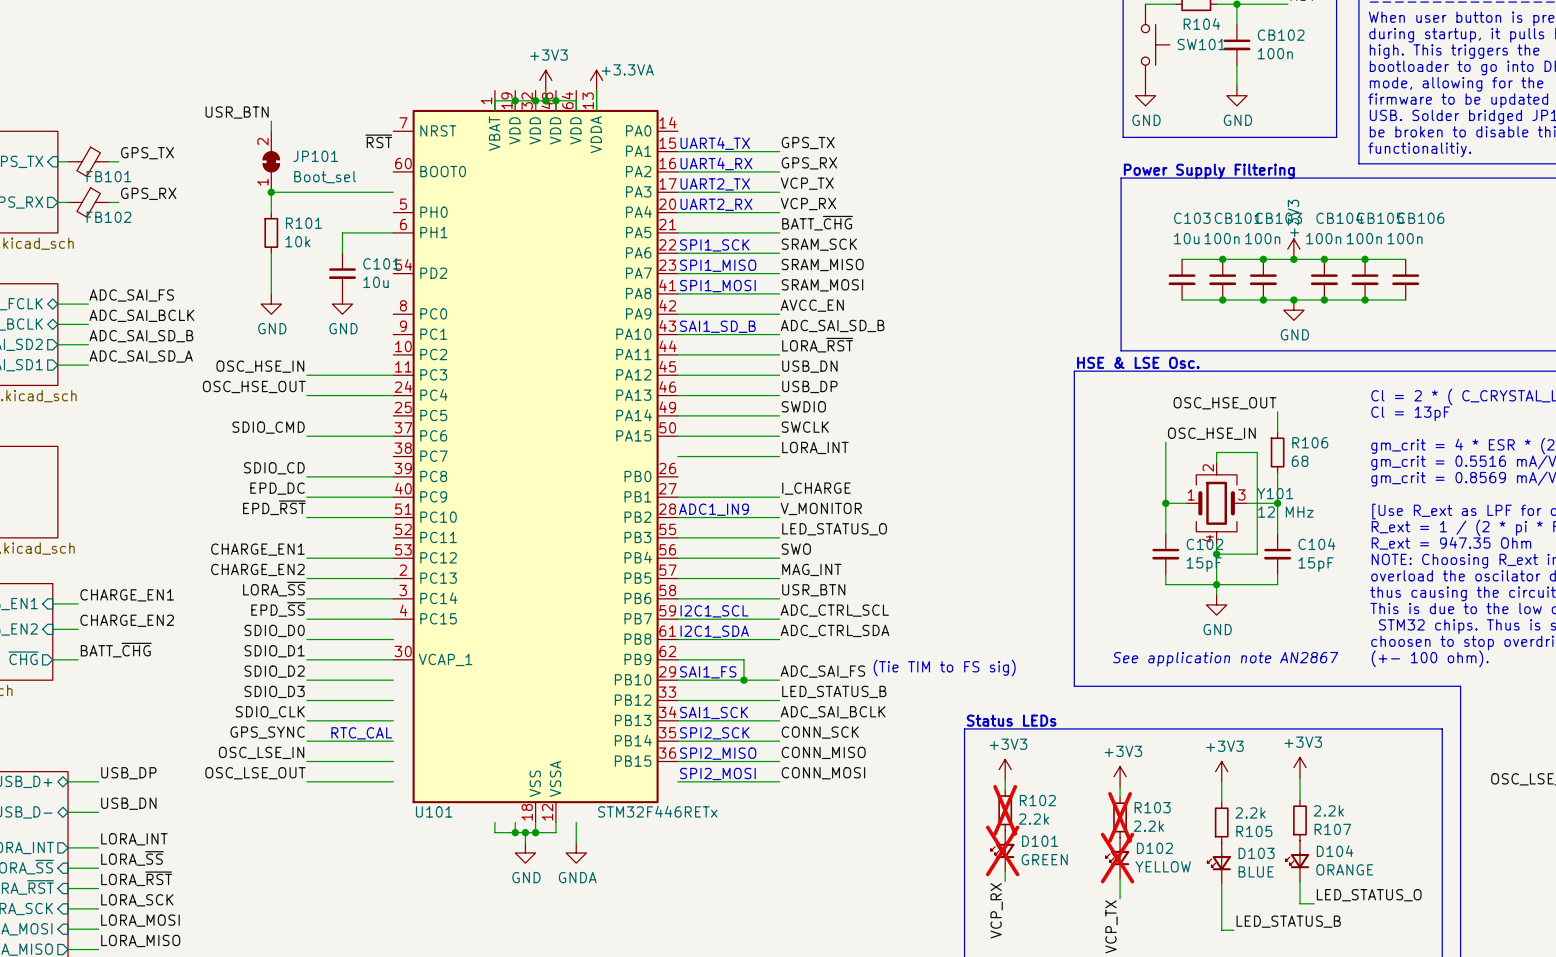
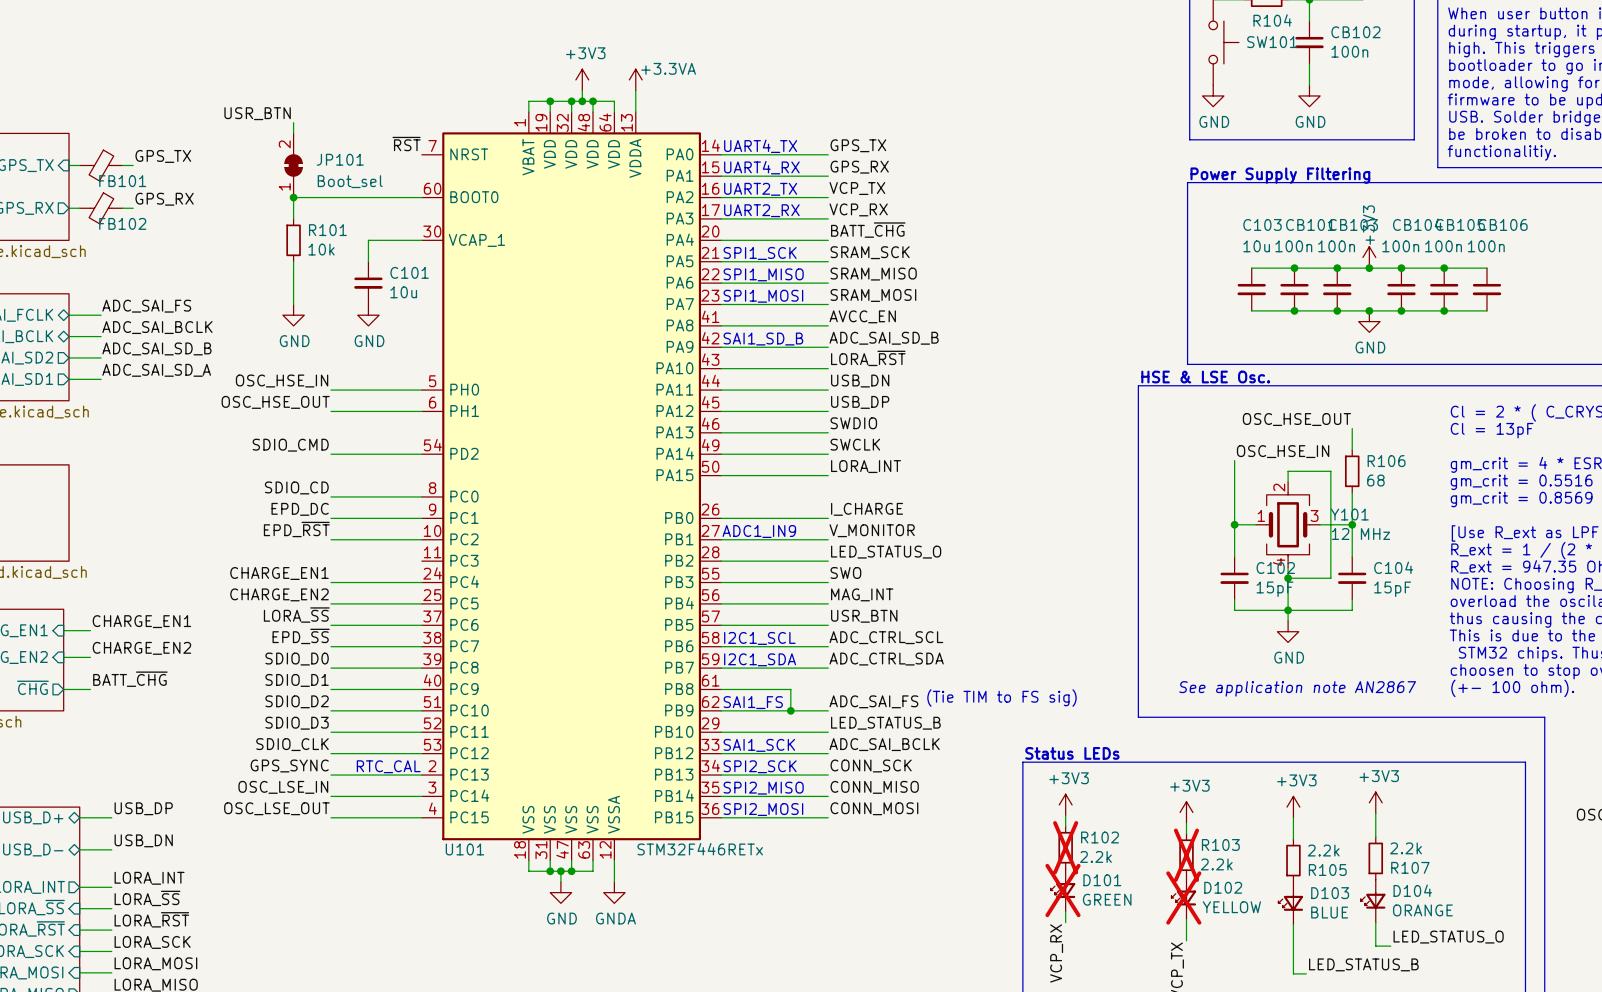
U101 symbol: [393, 90, 678, 823] -> [421, 112, 722, 861]

